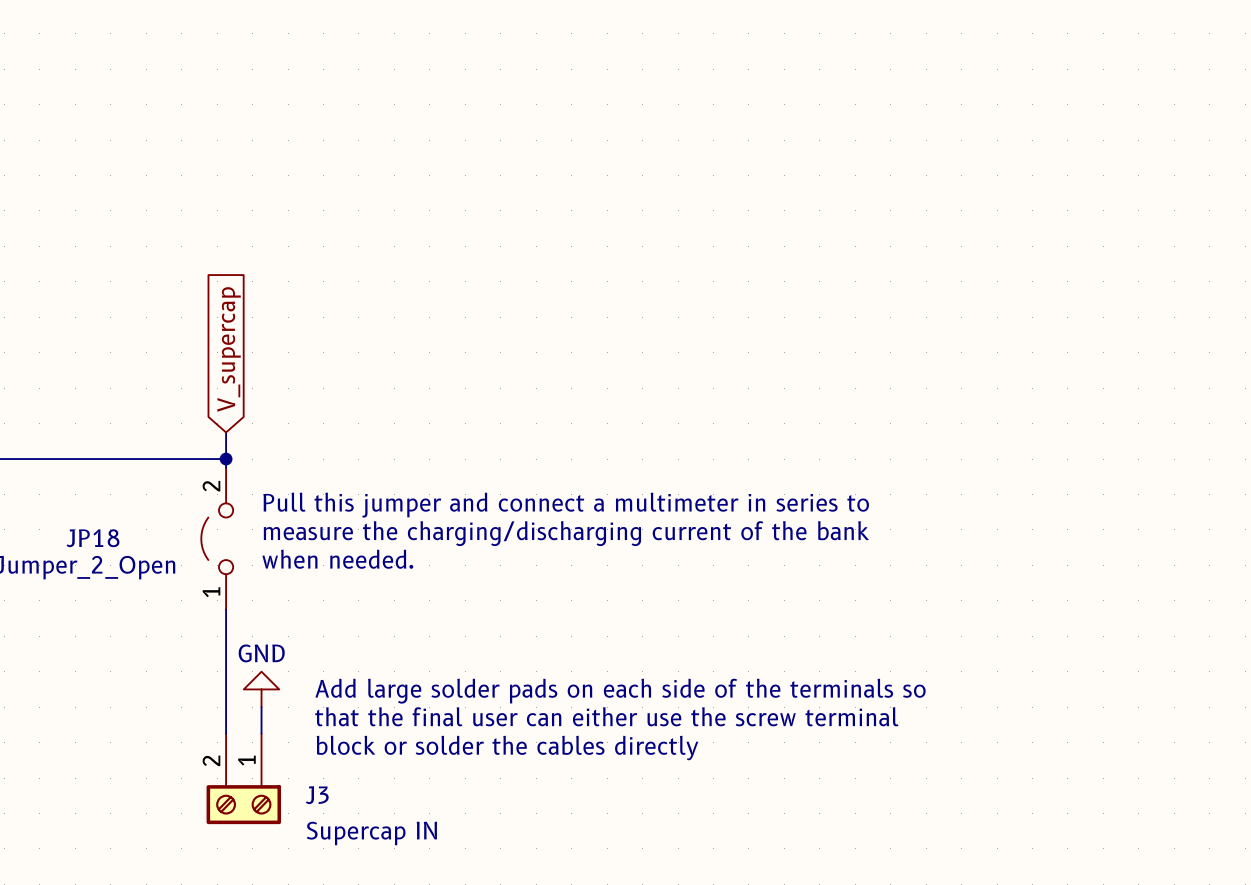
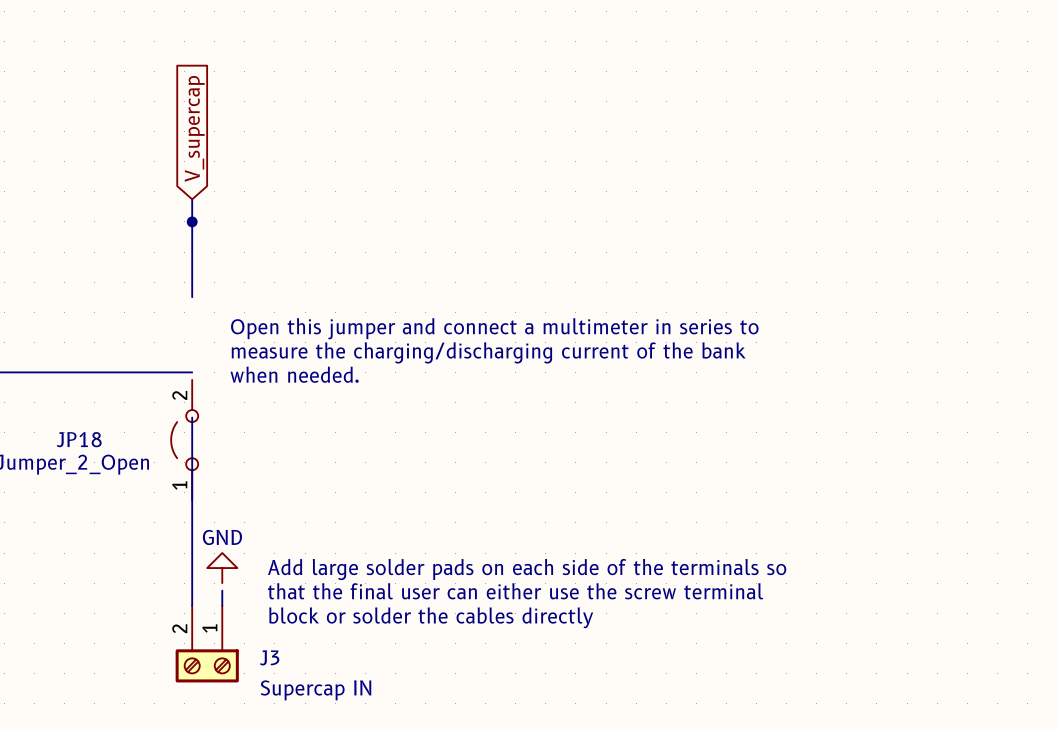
wire: none -> (192, 199) (192, 297)
junction: none -> (192, 221)
global label position: V_supercap (228, 349) -> V_supercap (194, 128)
text: none -> Open this jumper and connect a multimeter in series to (494, 328)
wire: (226, 432) (226, 467) -> none
junction: (226, 459) -> none
text: Pull this jumper and connect a multimeter in series to (566, 505) -> none
wire: none -> (192, 417) (192, 500)
text position: measure the charging/discharging current of the bank (566, 533) -> measure the charging/discharging current of the bank (488, 352)
text position: when needed. (337, 559) -> when needed. (294, 374)
wire: (261, 707) (261, 716) -> none

